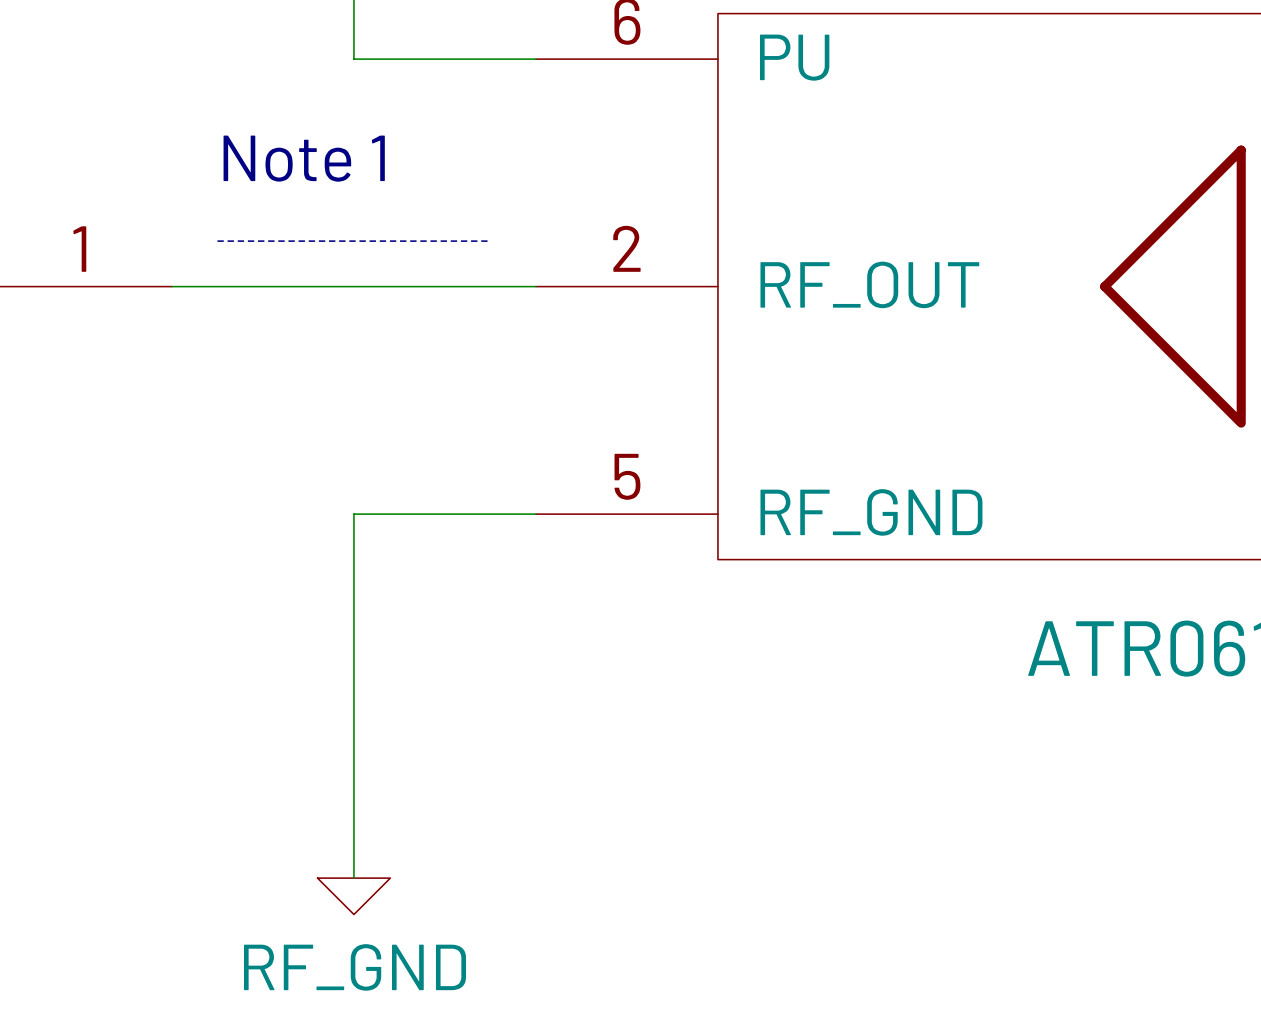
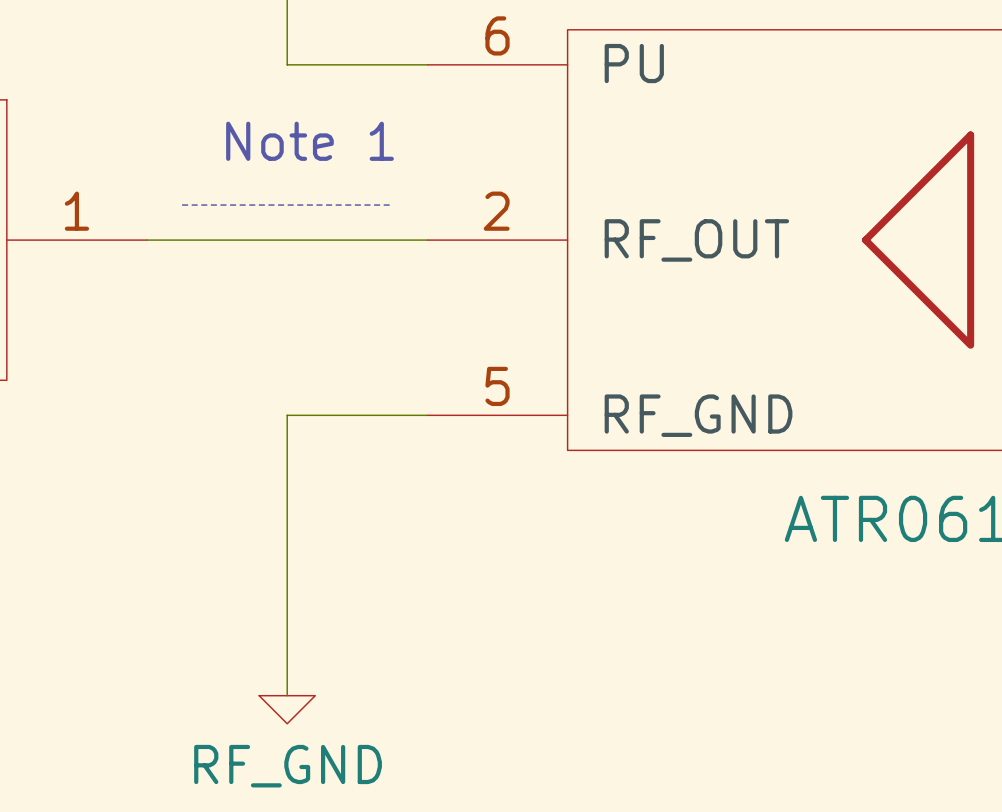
text position: Note 1 (304, 158) -> Note 1 (310, 141)

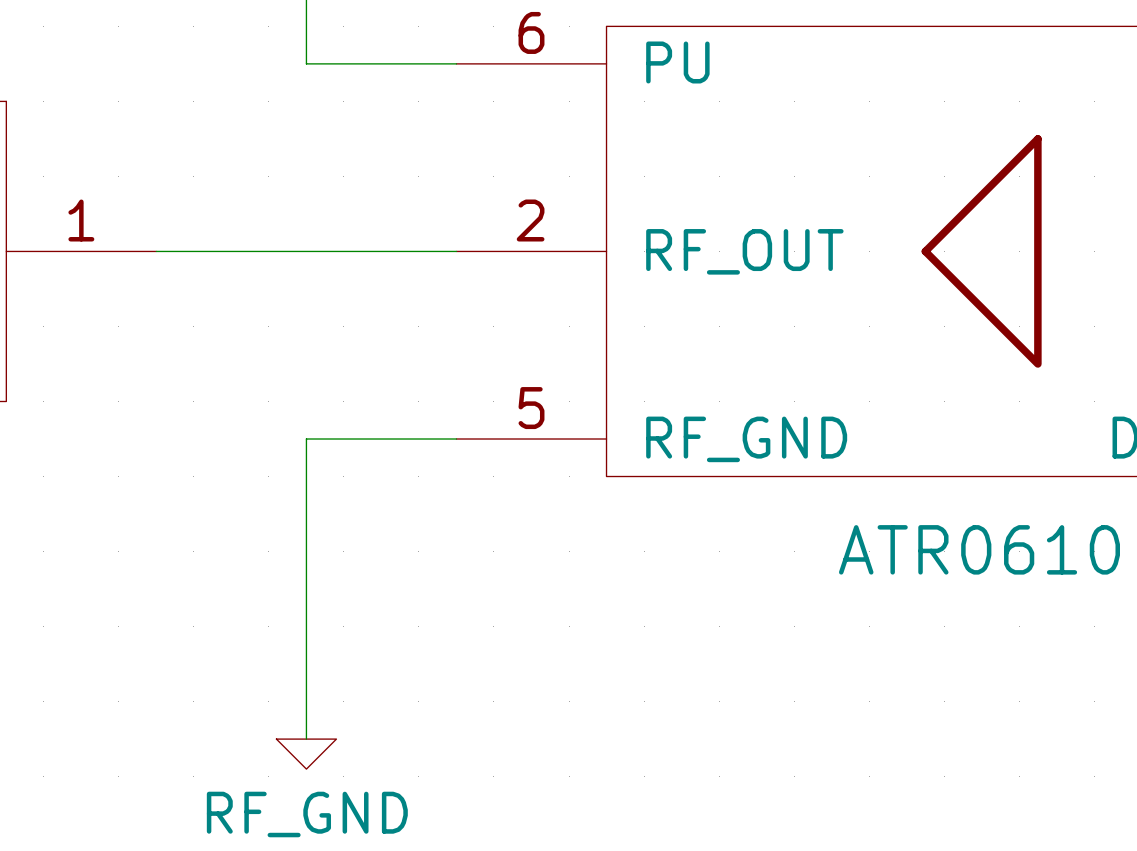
text: Note 1 (310, 141) -> none
line: (182, 205) (392, 205) -> none

